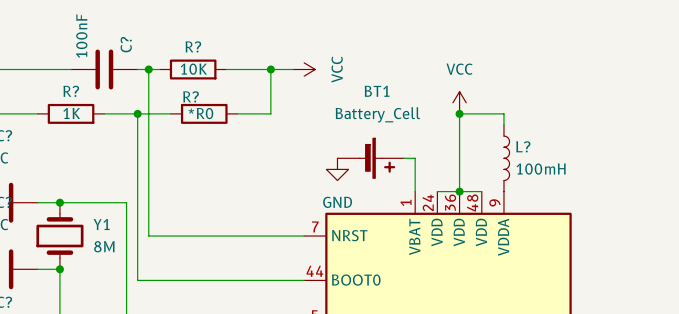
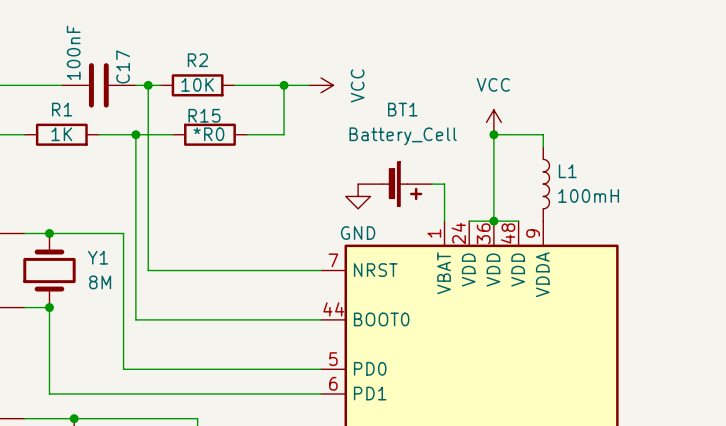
C? name: C? (126, 44) -> C17 (123, 66)
R? name: R? (193, 46) -> R2 (197, 60)
R? name: R? (71, 91) -> R1 (62, 109)
R? name: R? (191, 96) -> R15 (204, 115)
L? name: L? (523, 146) -> L1 (567, 171)

